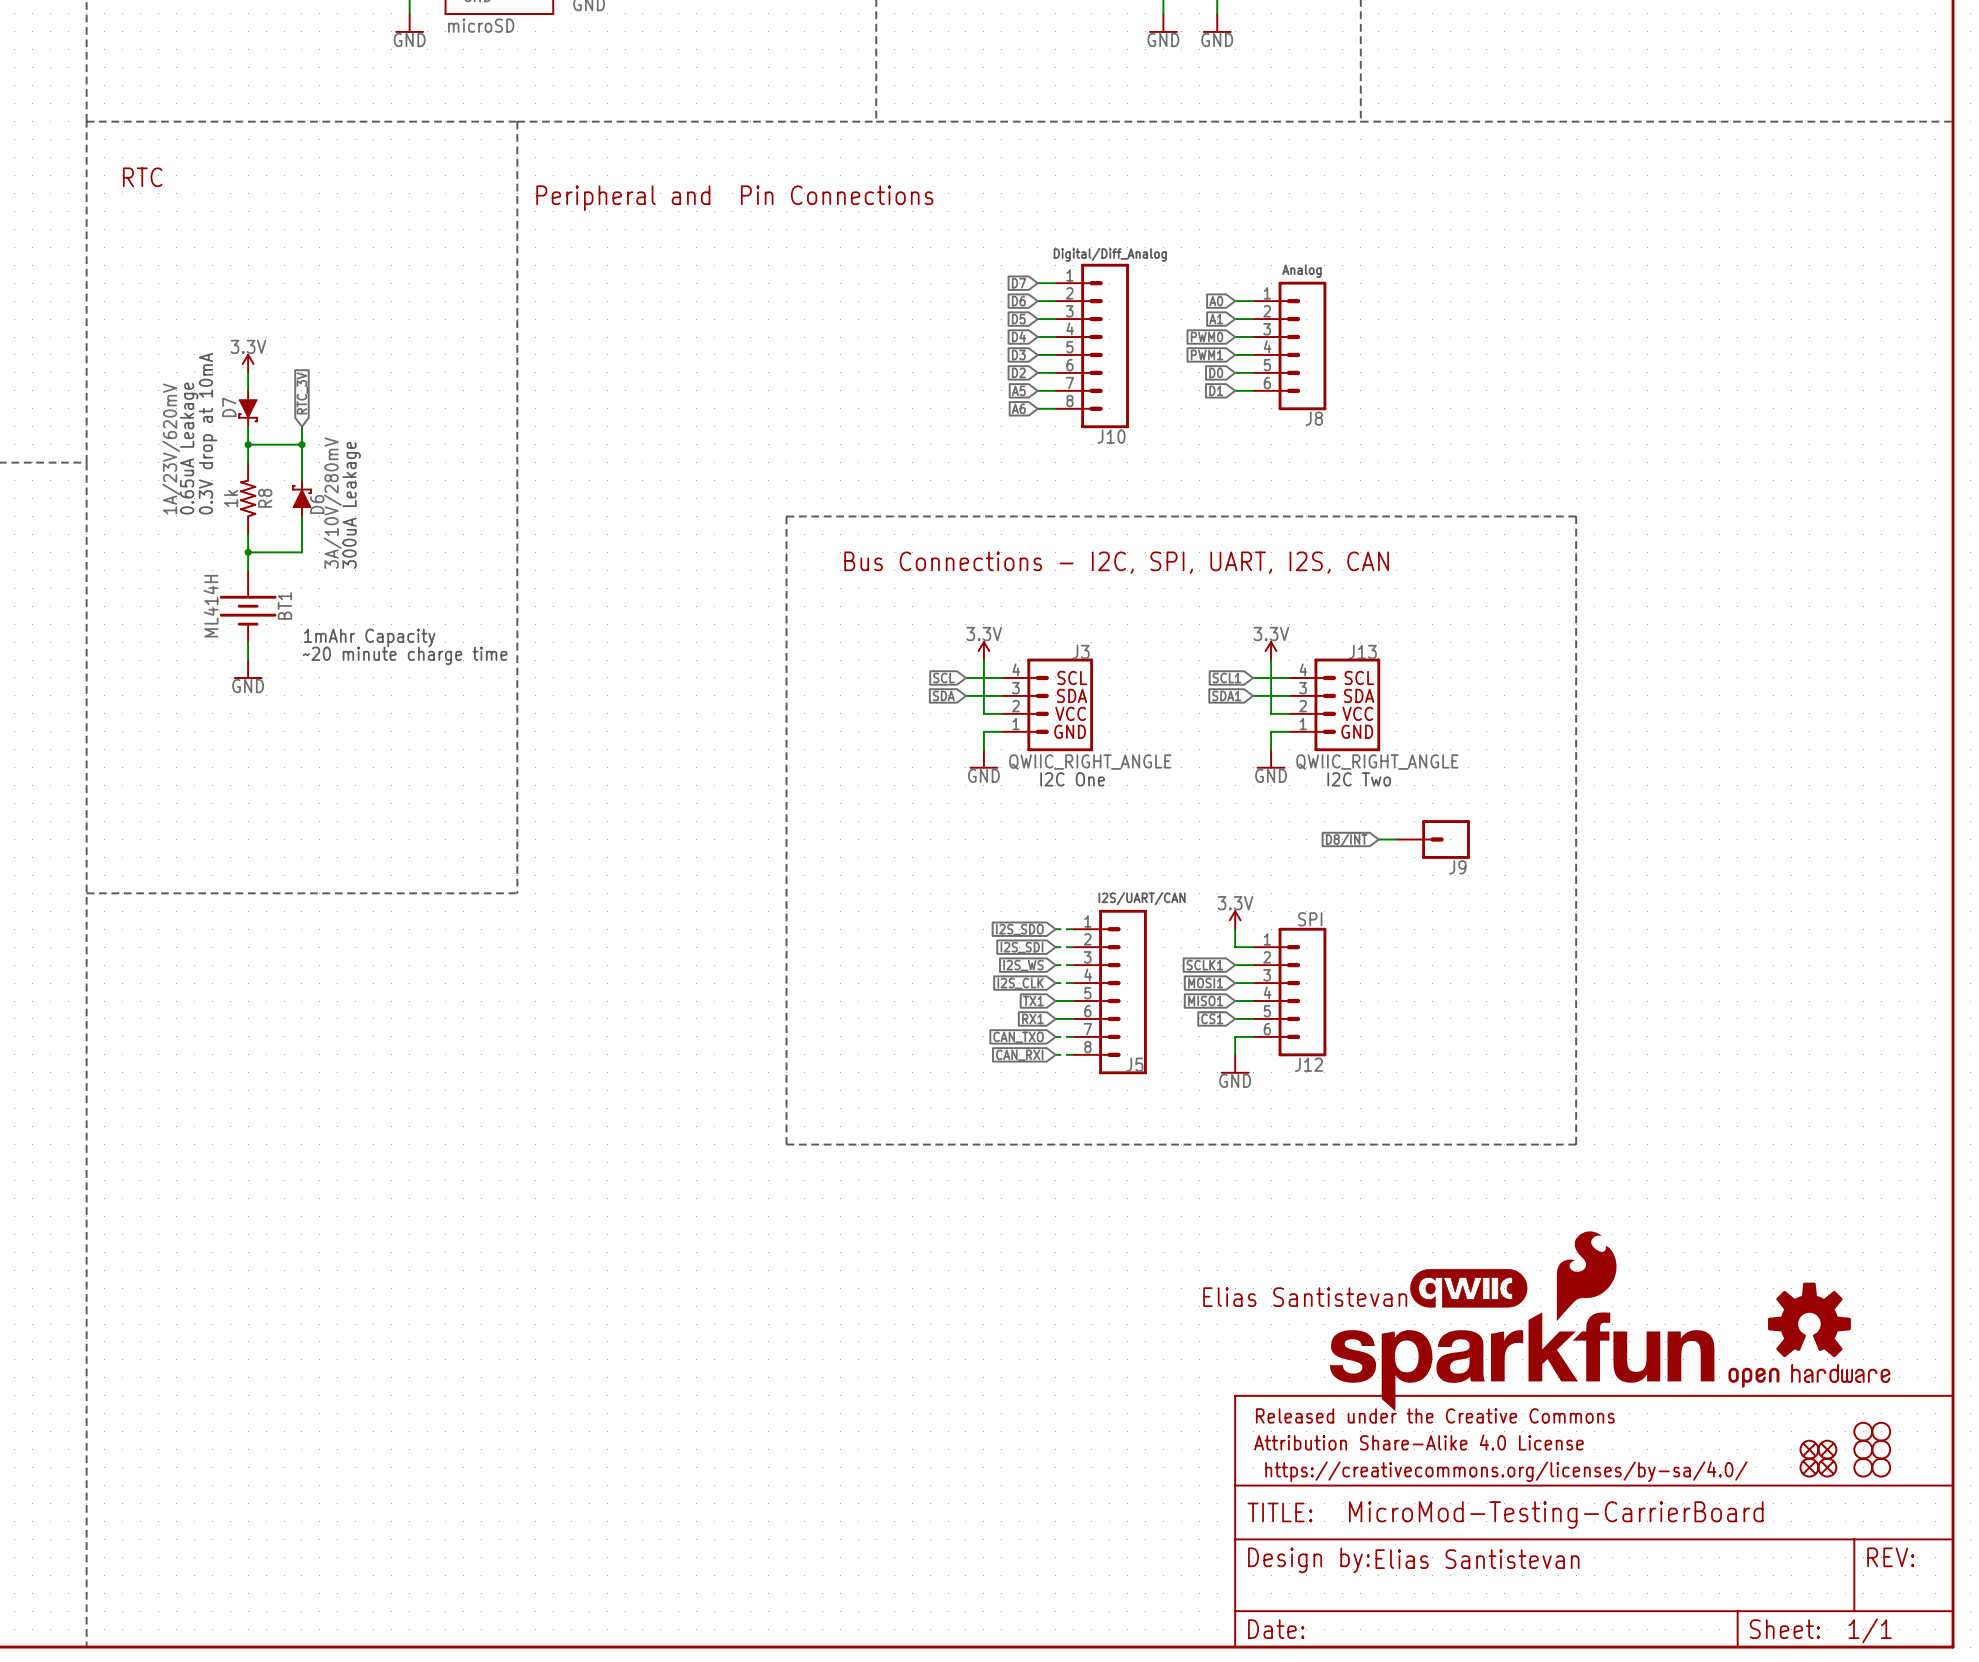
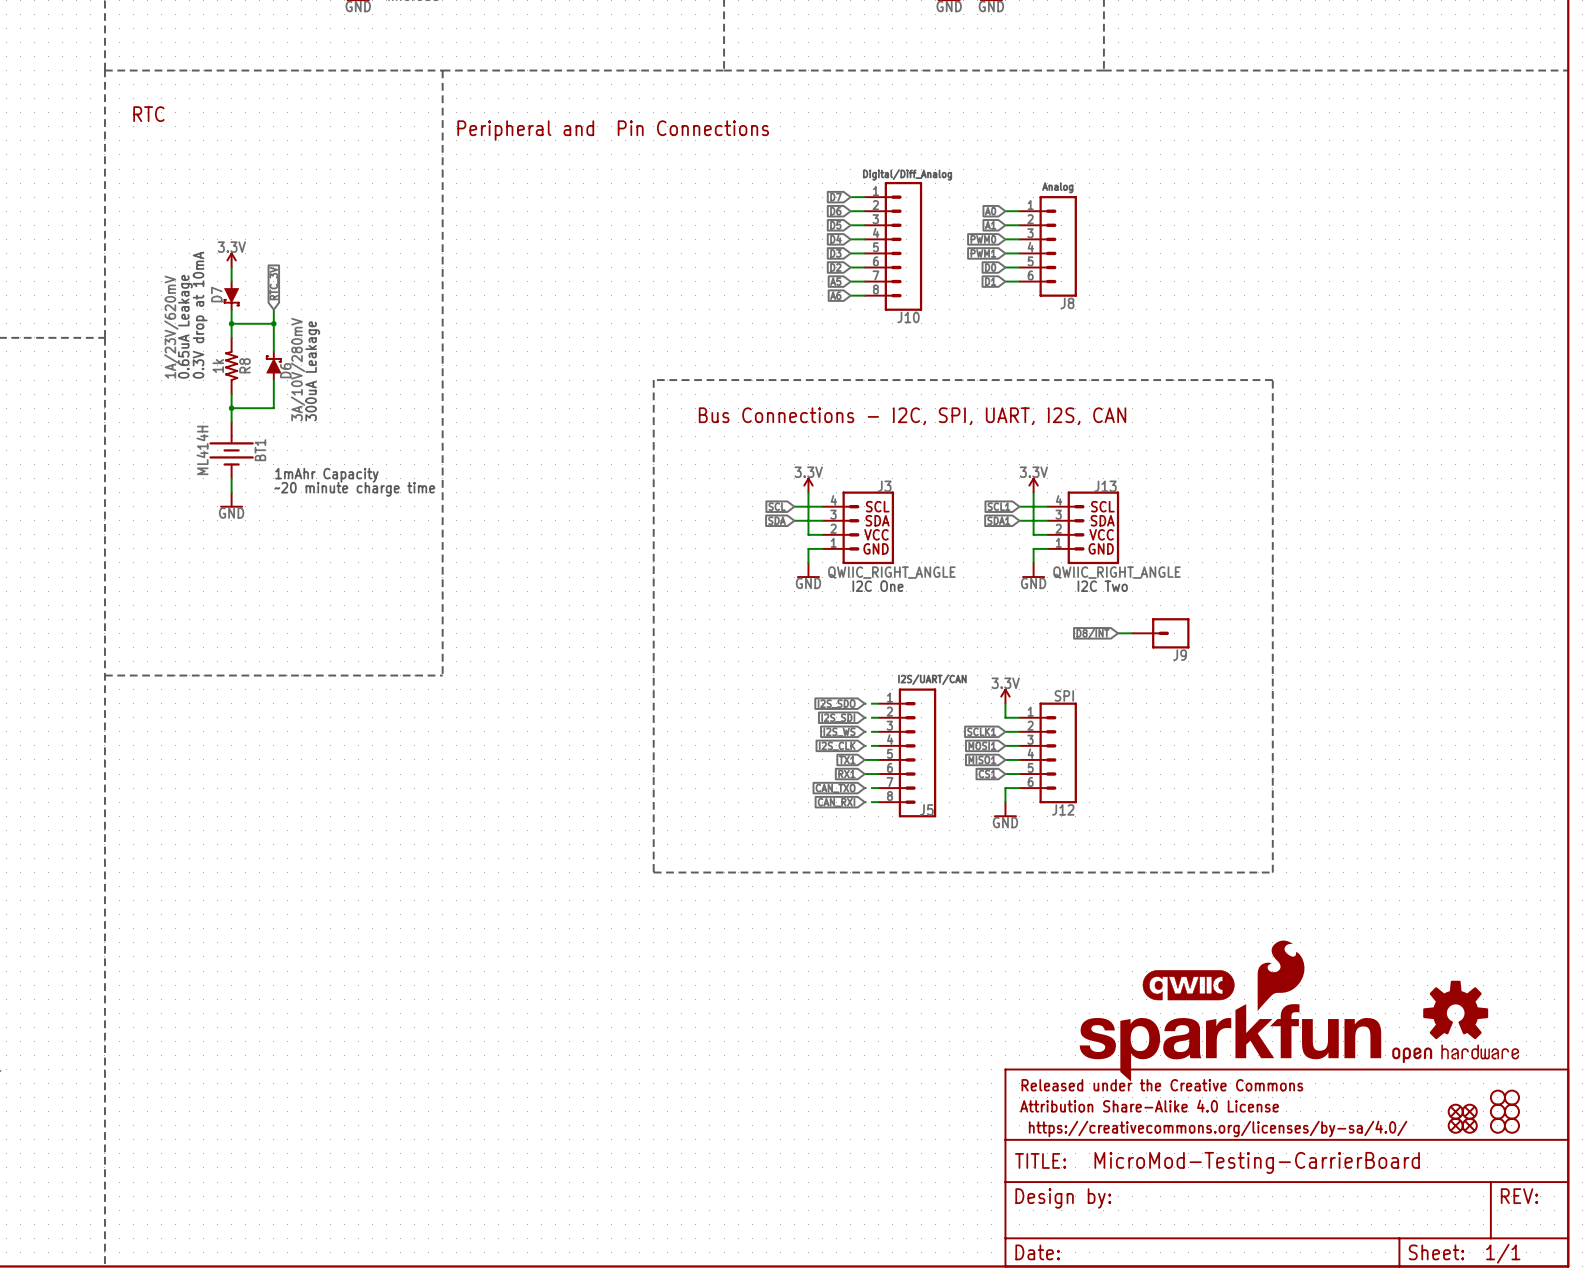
text: Elias Santistevan (1305, 1297) -> none
text: Elias Santistevan (1477, 1559) -> none

